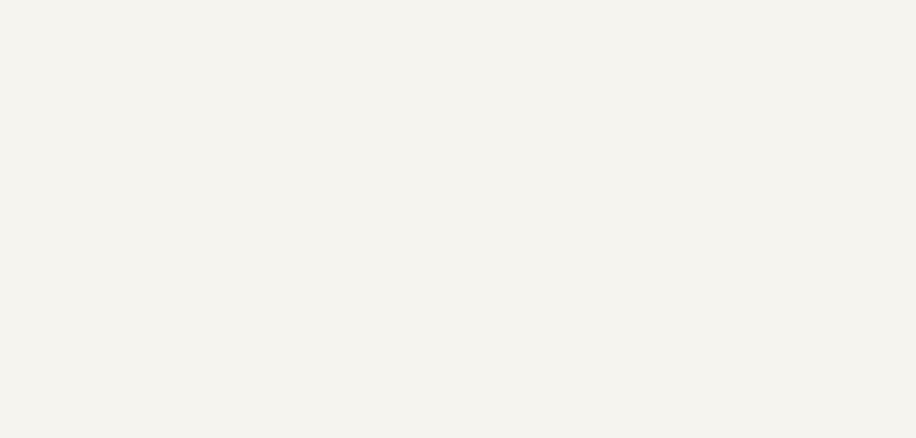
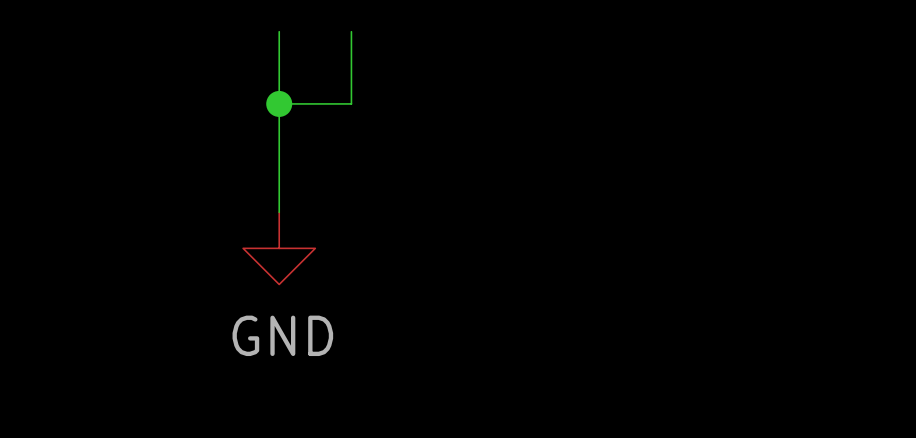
wire: none -> (279, 31) (279, 212)
wire: none -> (351, 31) (351, 103) (279, 103)
junction: none -> (279, 103)
power symbol: none -> GND (279, 248)

